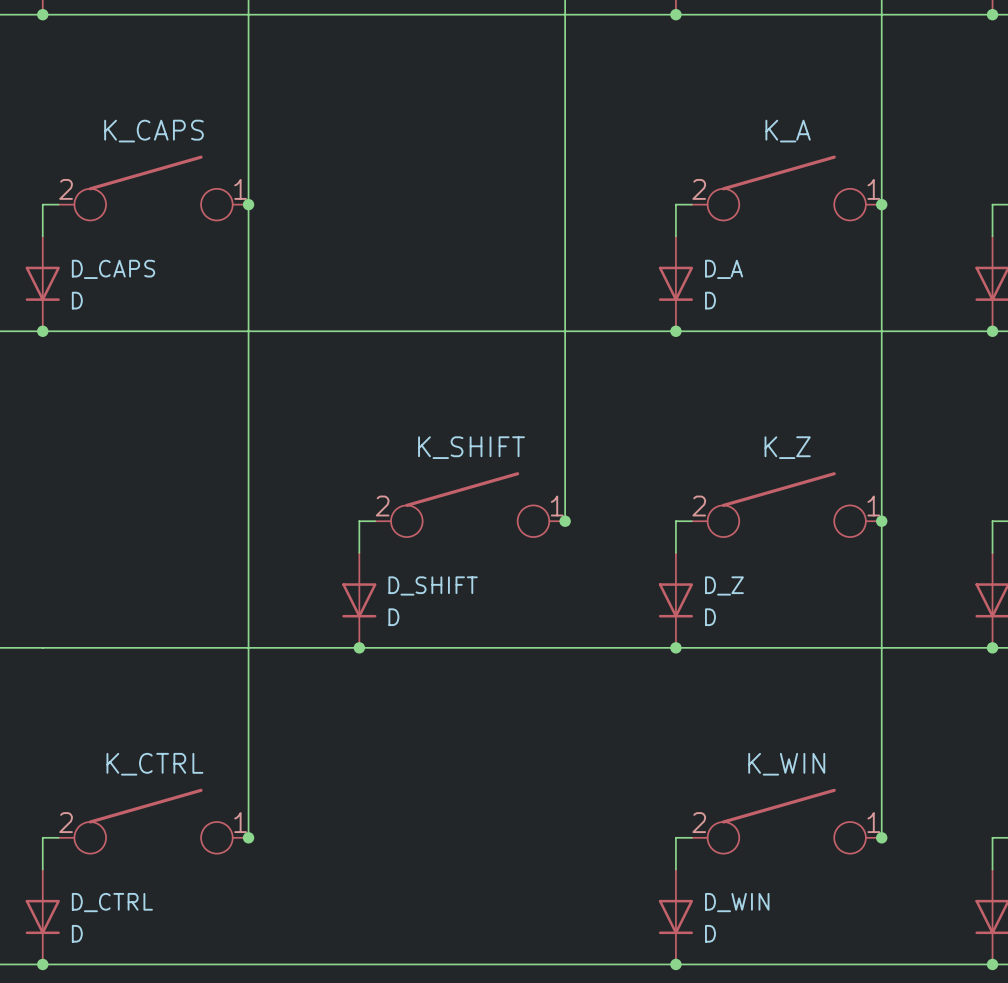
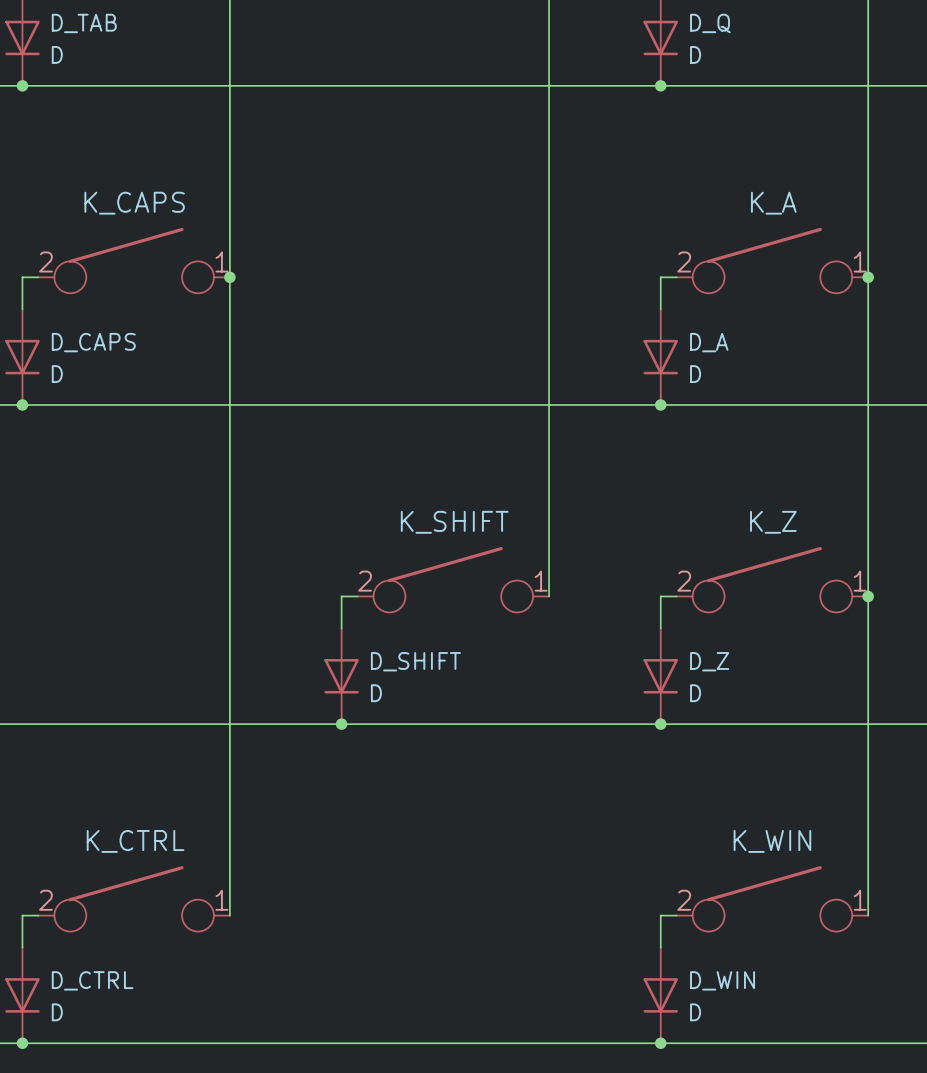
junction: (565, 521) -> none
junction: (248, 837) -> none
junction: (881, 837) -> none

